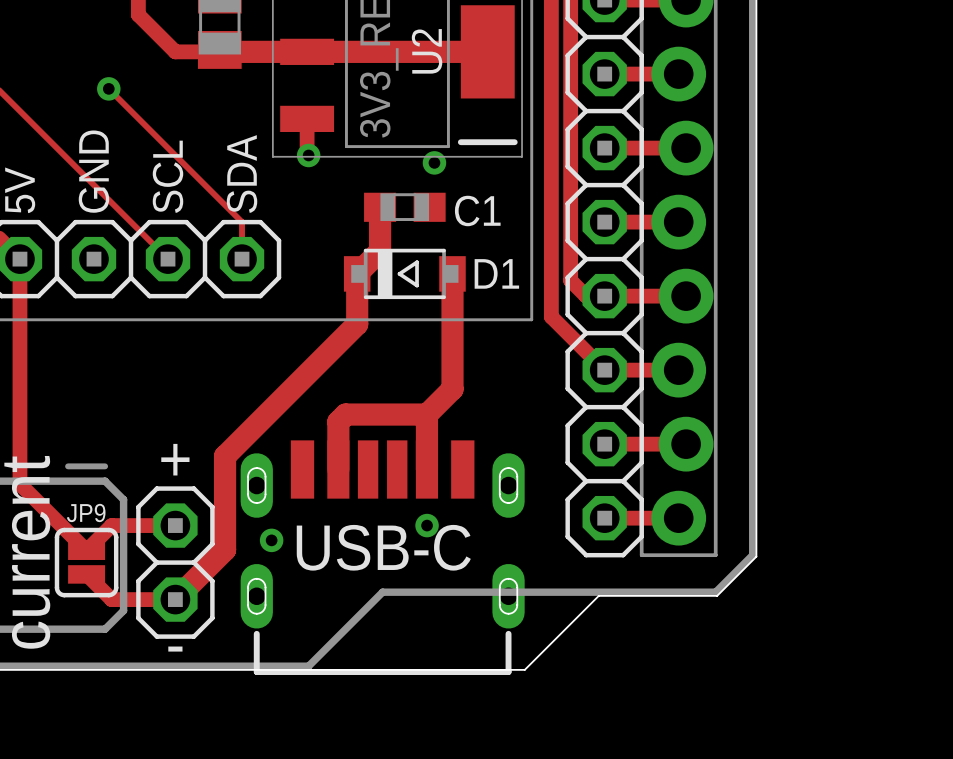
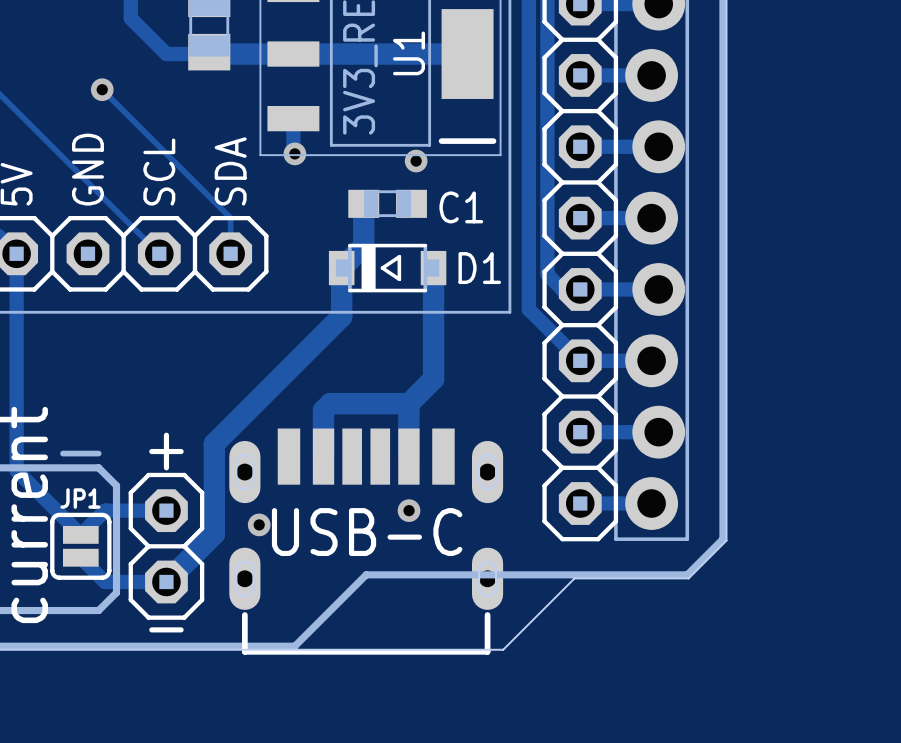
U2 name: U2 (427, 51) -> U1 (409, 53)
JP9 name: JP9 (86, 512) -> JP1 (80, 498)

